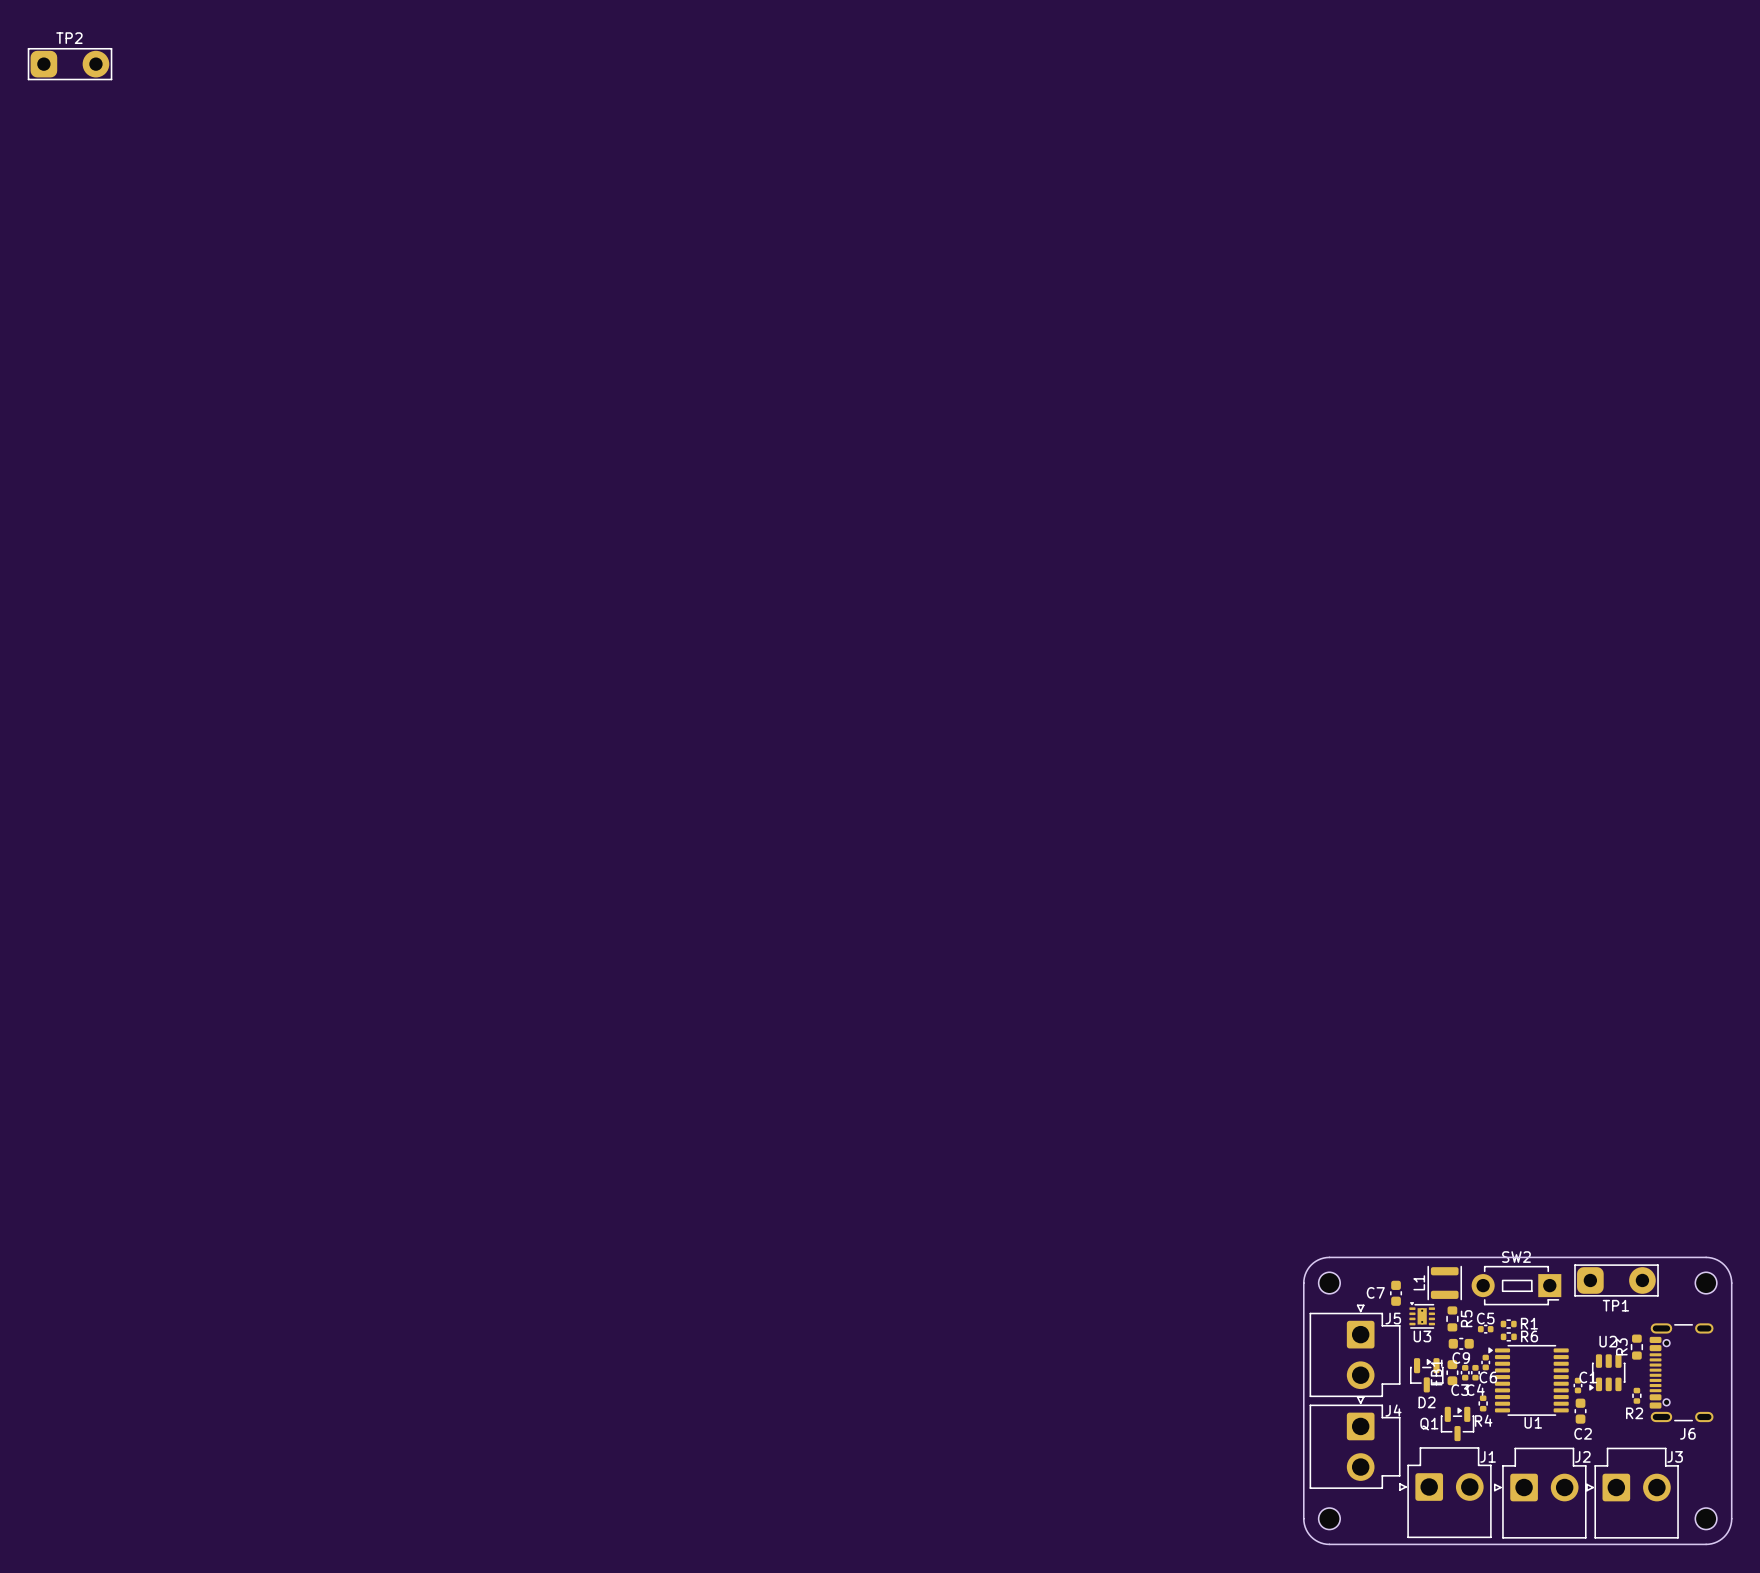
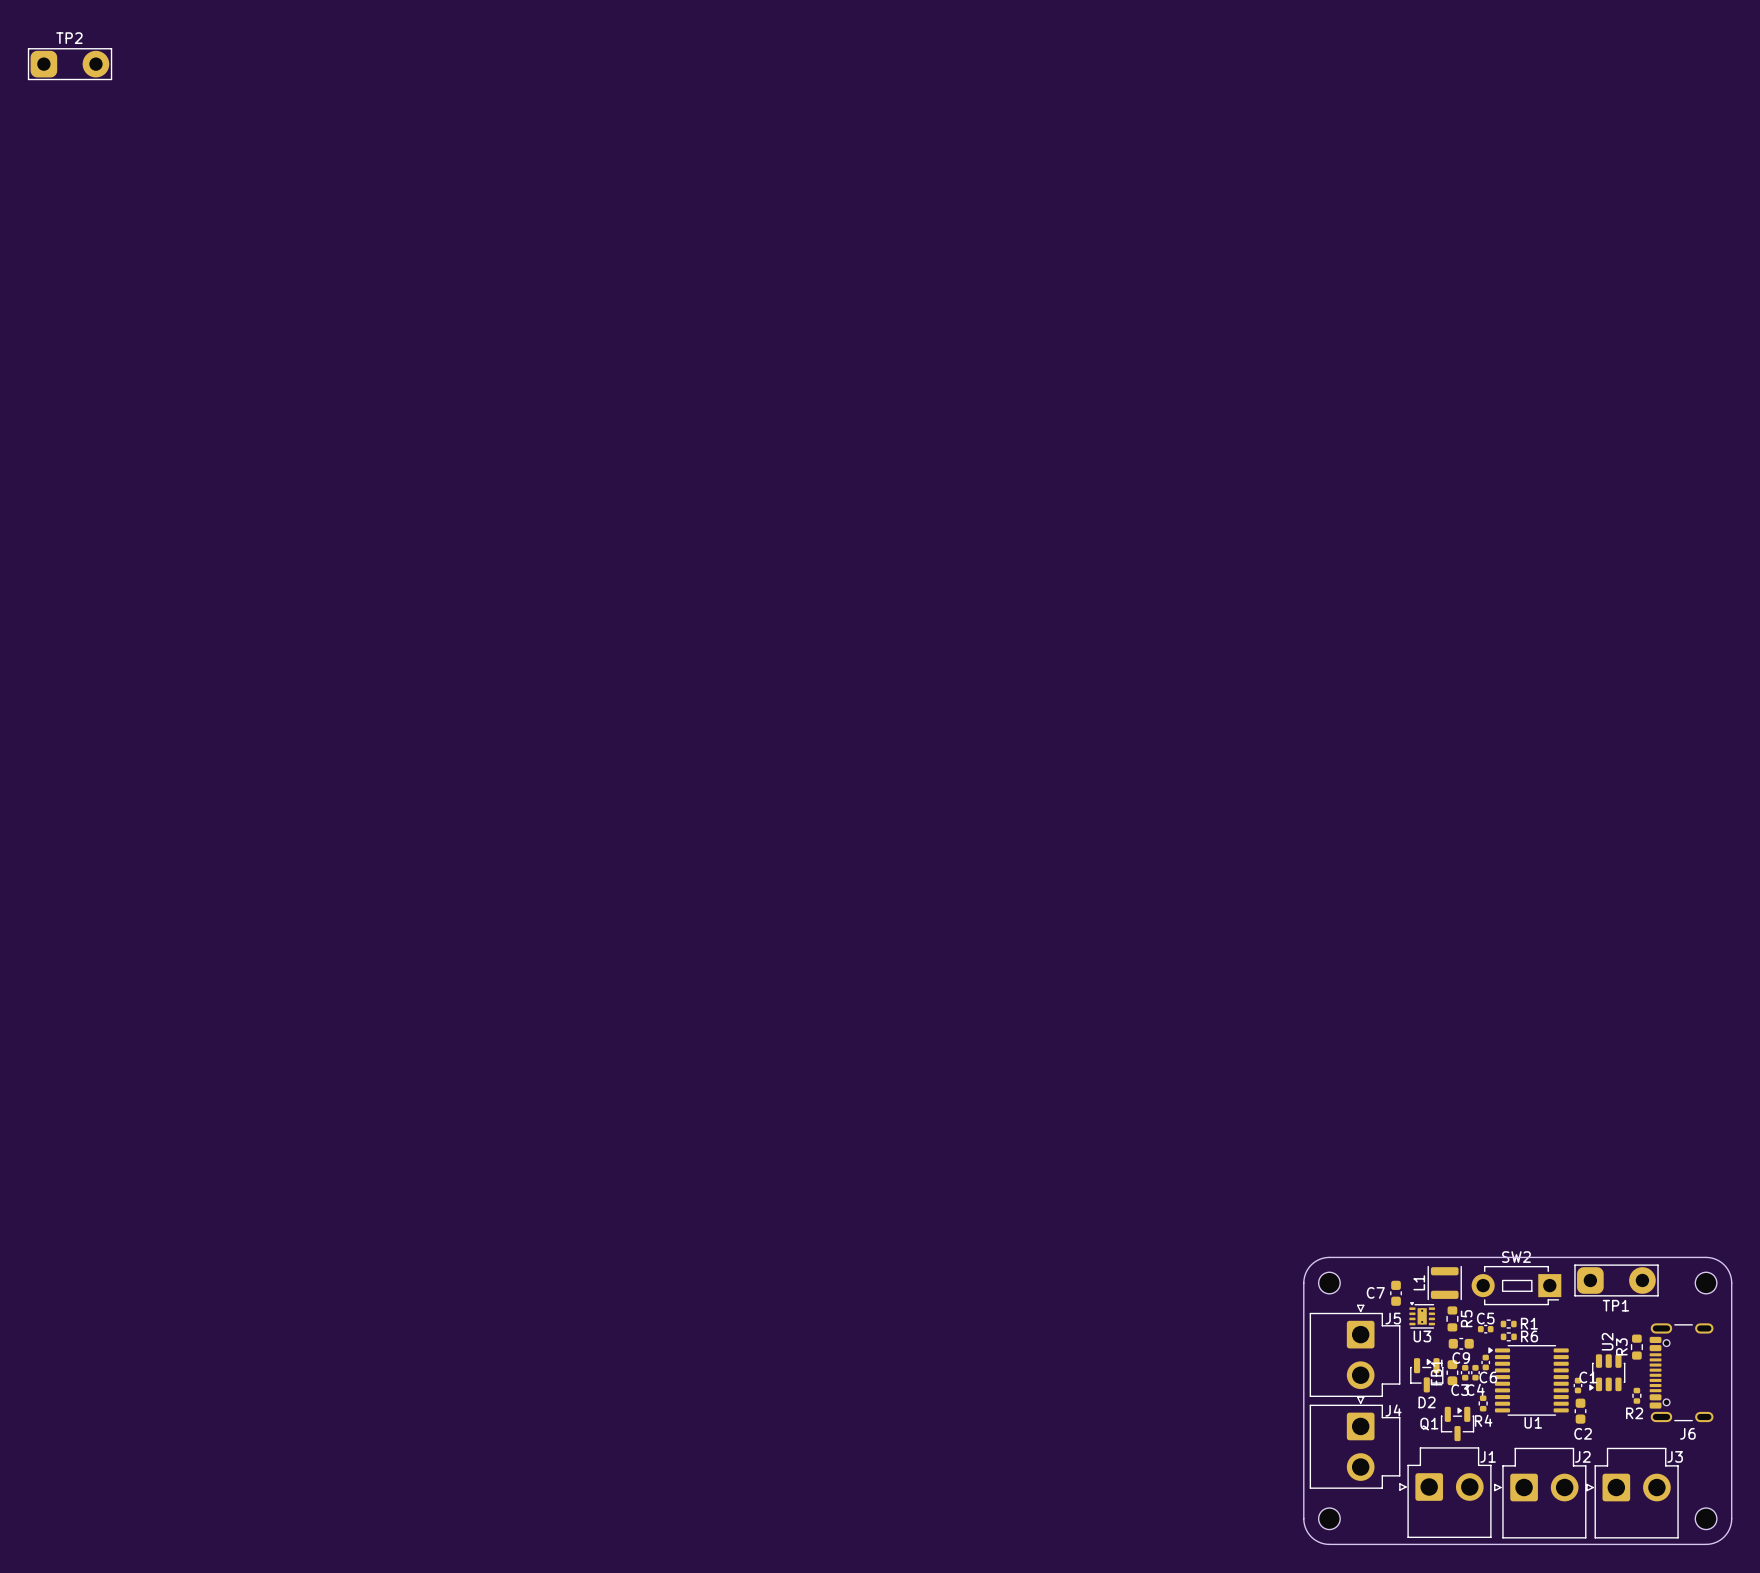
U2 name rotation: 0° (1608, 1341) -> 90° counterclockwise (1607, 1341)

